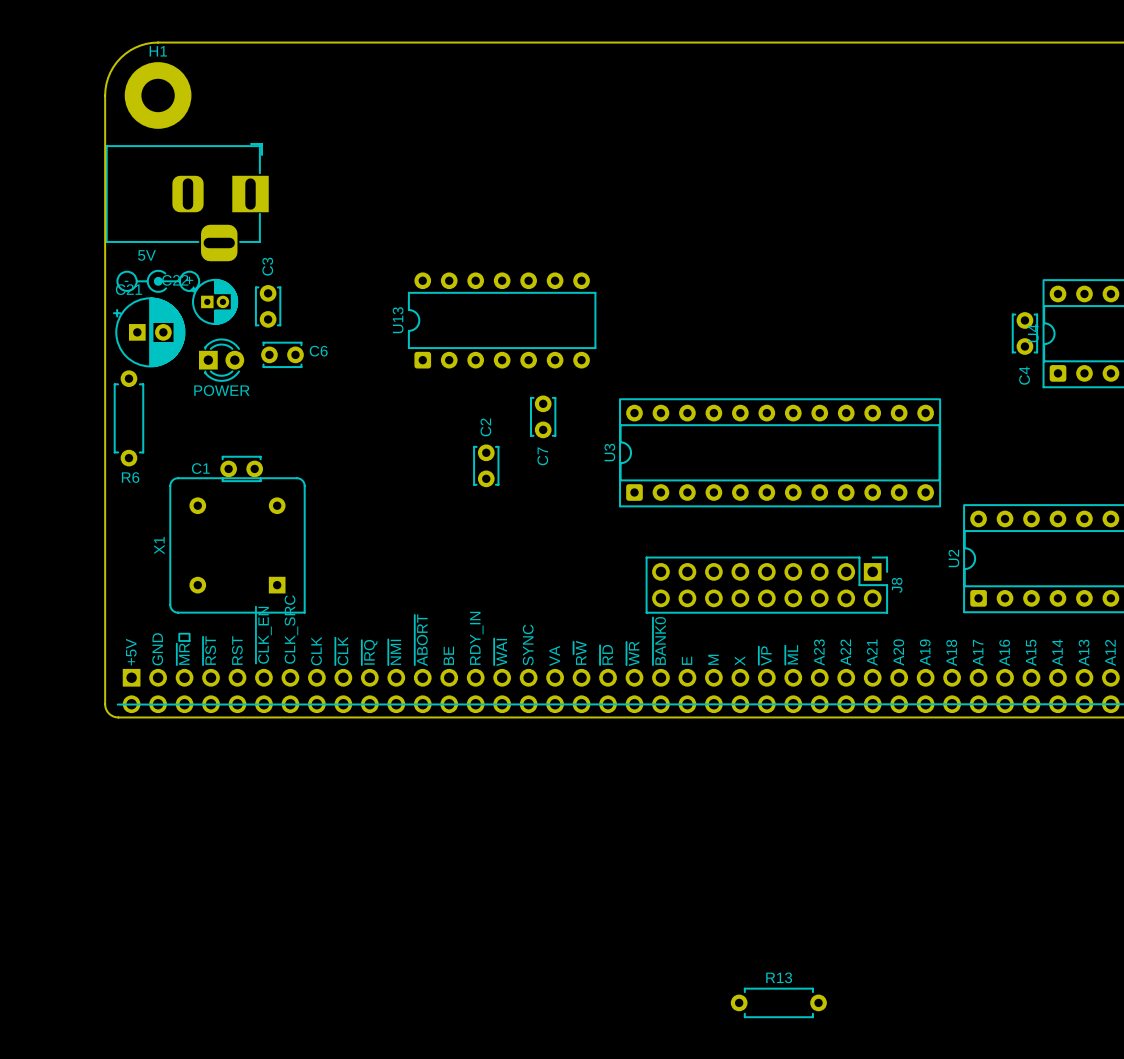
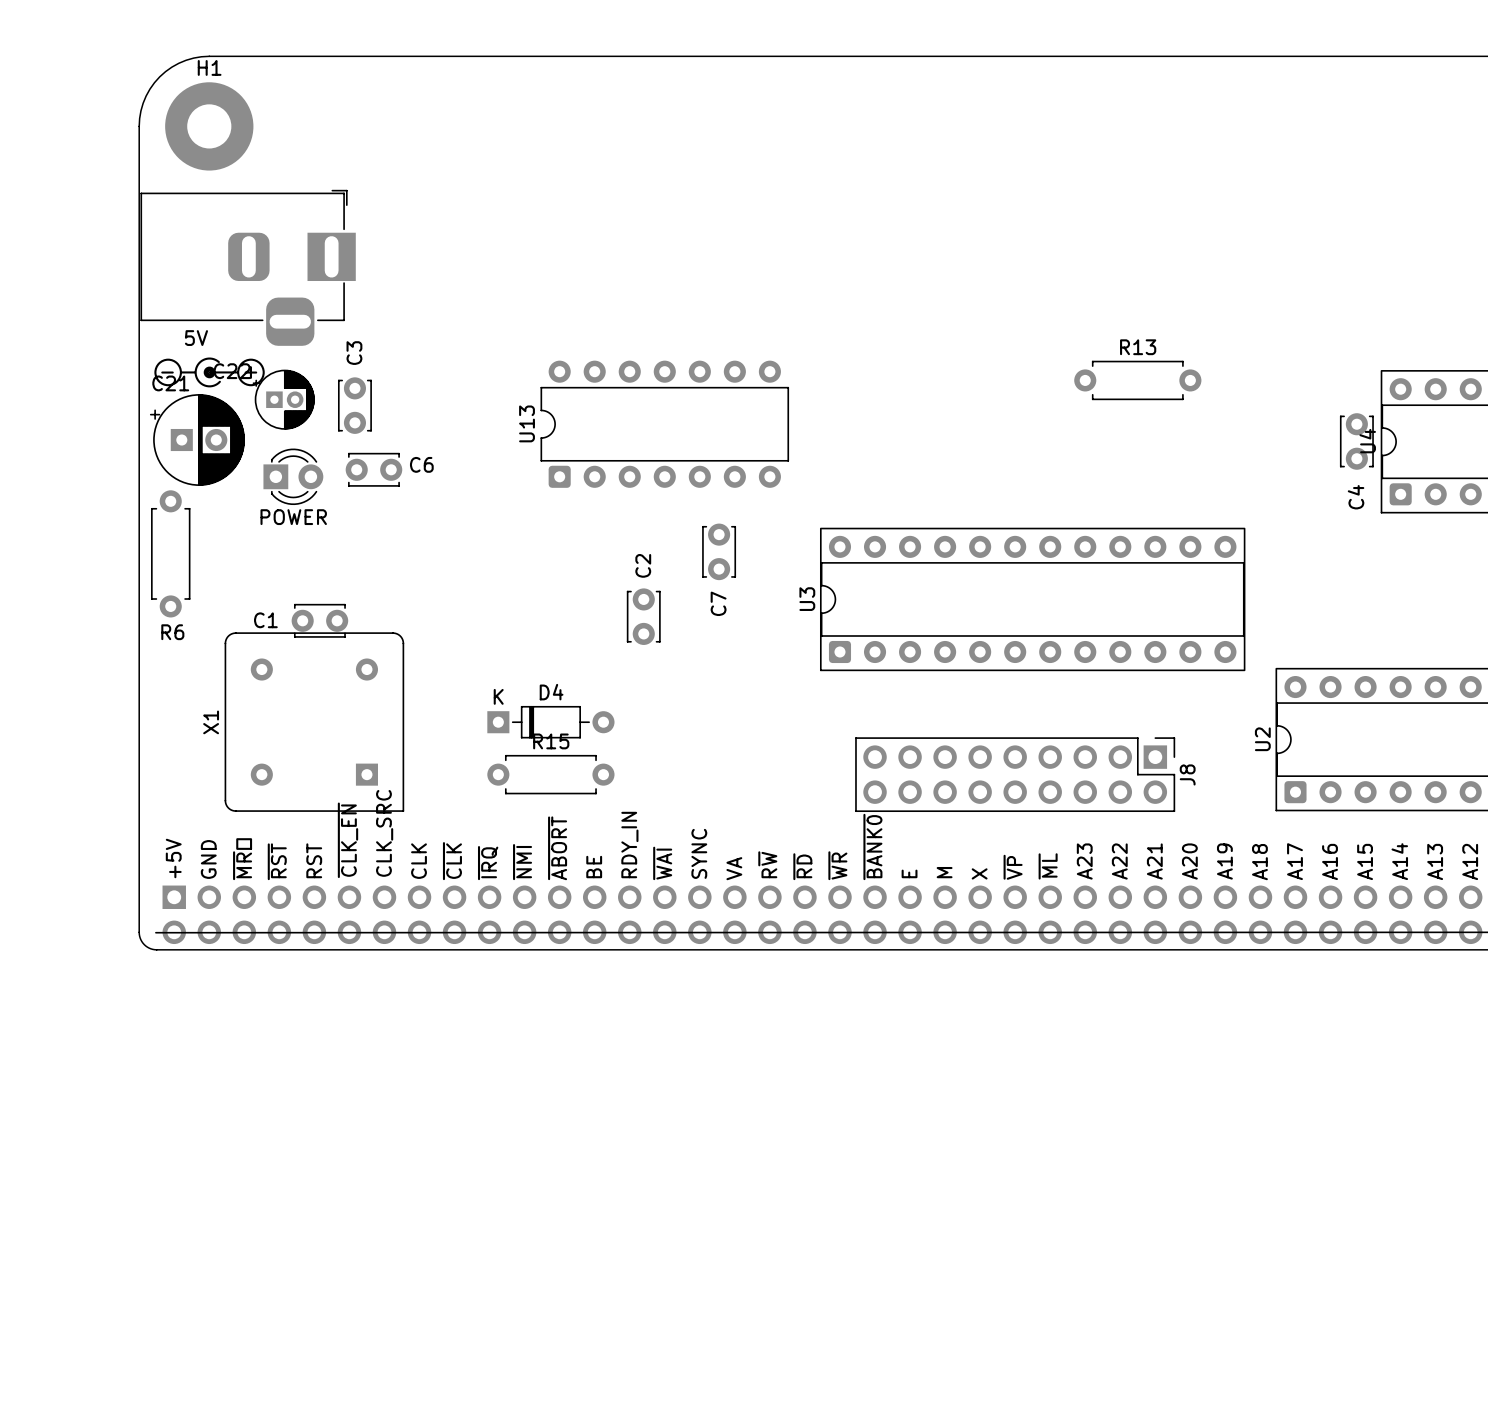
D4: none -> (550, 722)
R15: none -> (550, 774)
R13 position: (778, 1002) -> (1137, 380)

